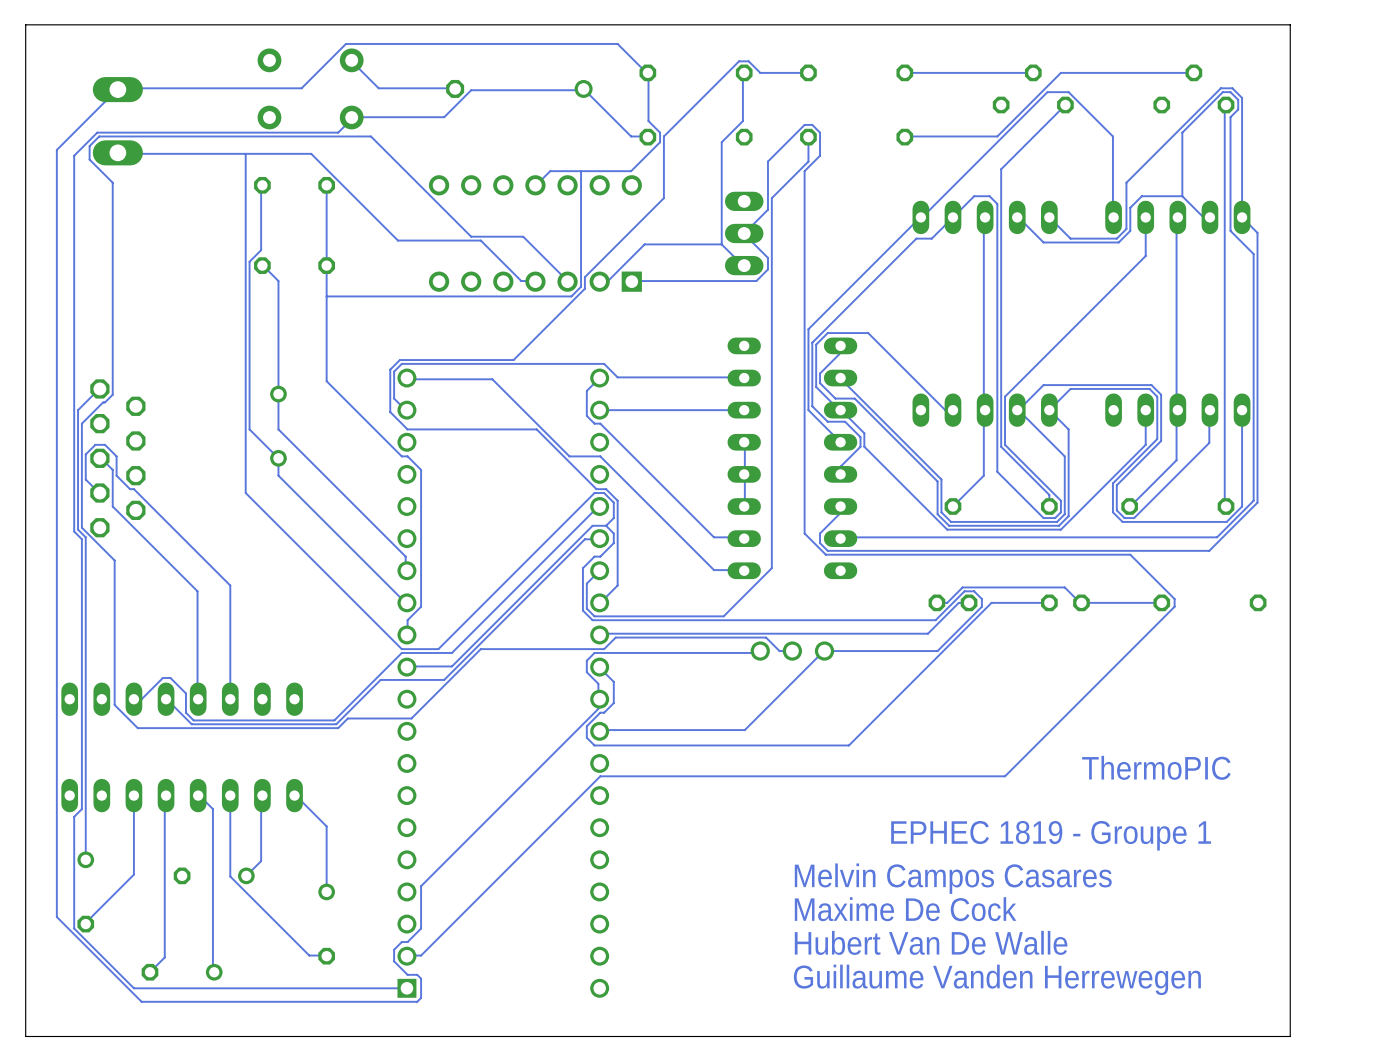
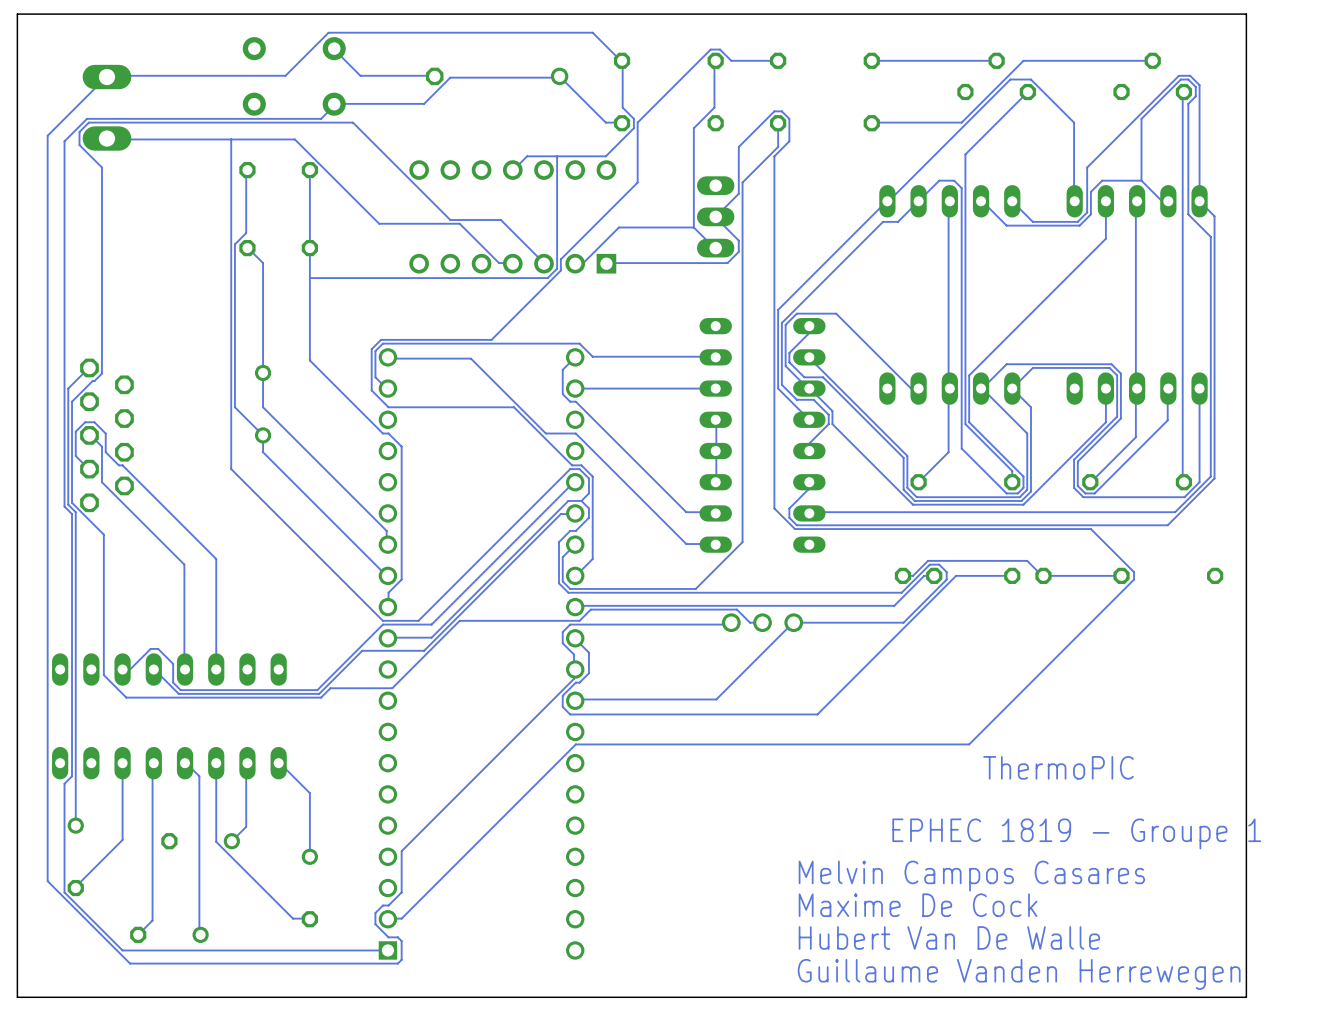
text position: ThermoPIC (1156, 767) -> ThermoPIC (1058, 767)
text position: EPHEC 1819 - Groupe 1 (1051, 835) -> EPHEC 1819 - Groupe 1 (1076, 833)
text position: Melvin Campos Casares (953, 878) -> Melvin Campos Casares (971, 876)
text position: Maxime De Cock (905, 909) -> Maxime De Cock (918, 905)
text position: Hubert Van De Walle (931, 942) -> Hubert Van De Walle (949, 937)
text position: Guillaume Vanden Herrewegen (997, 979) -> Guillaume Vanden Herrewegen (1019, 974)

